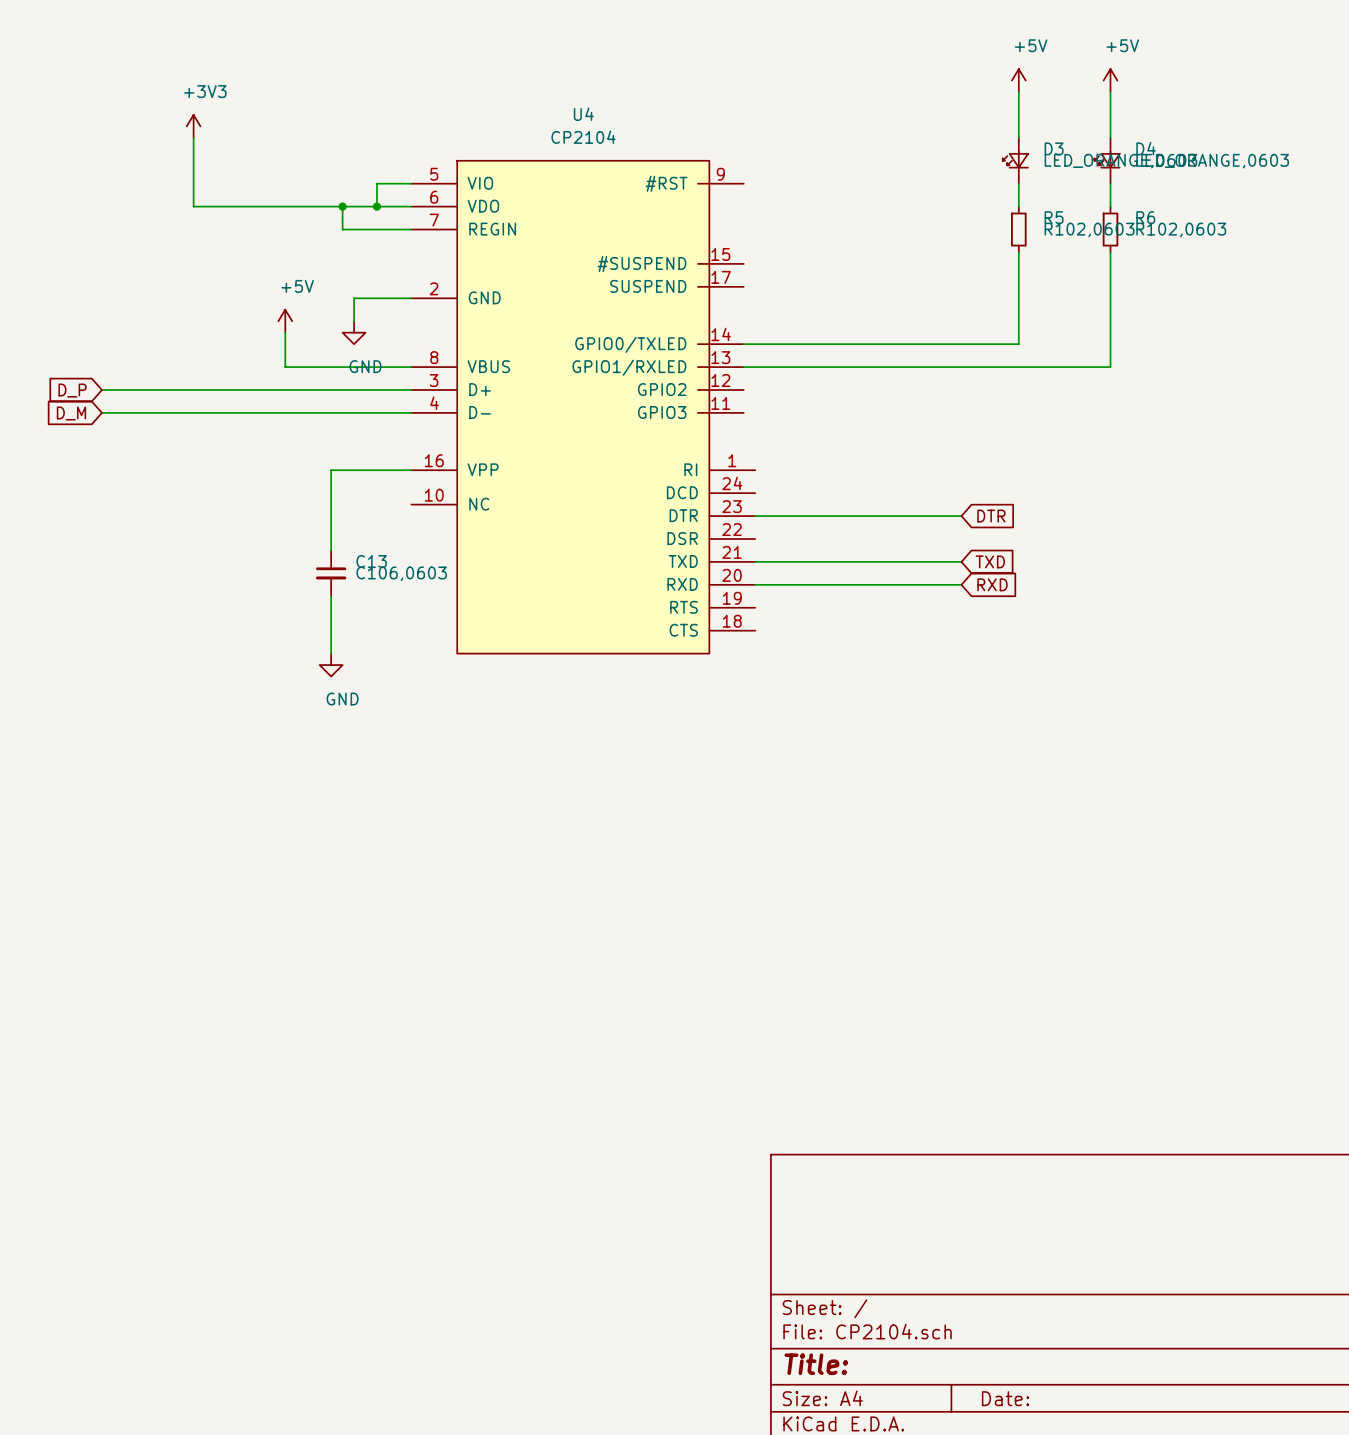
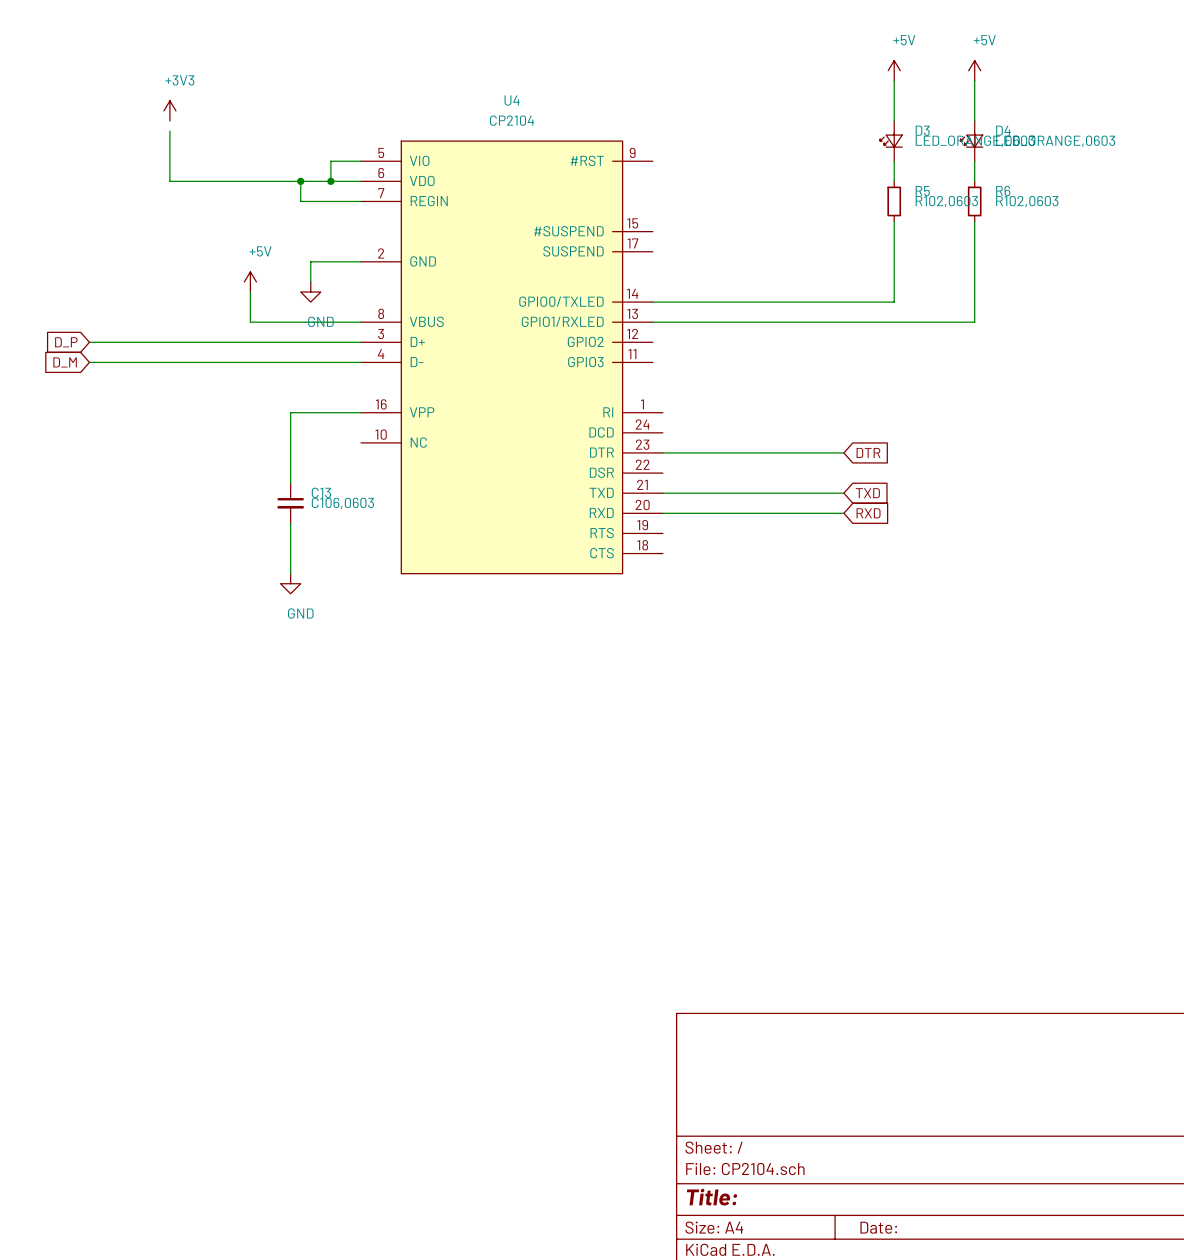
wire: (193, 137) (193, 149) -> none

